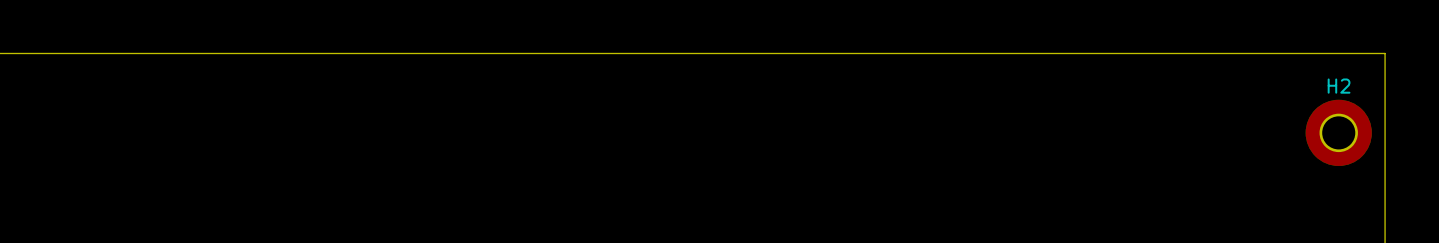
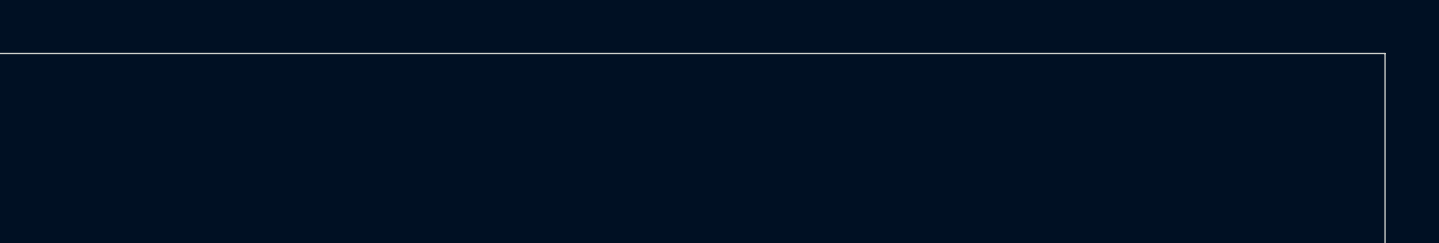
H2: (1338, 132) -> none

